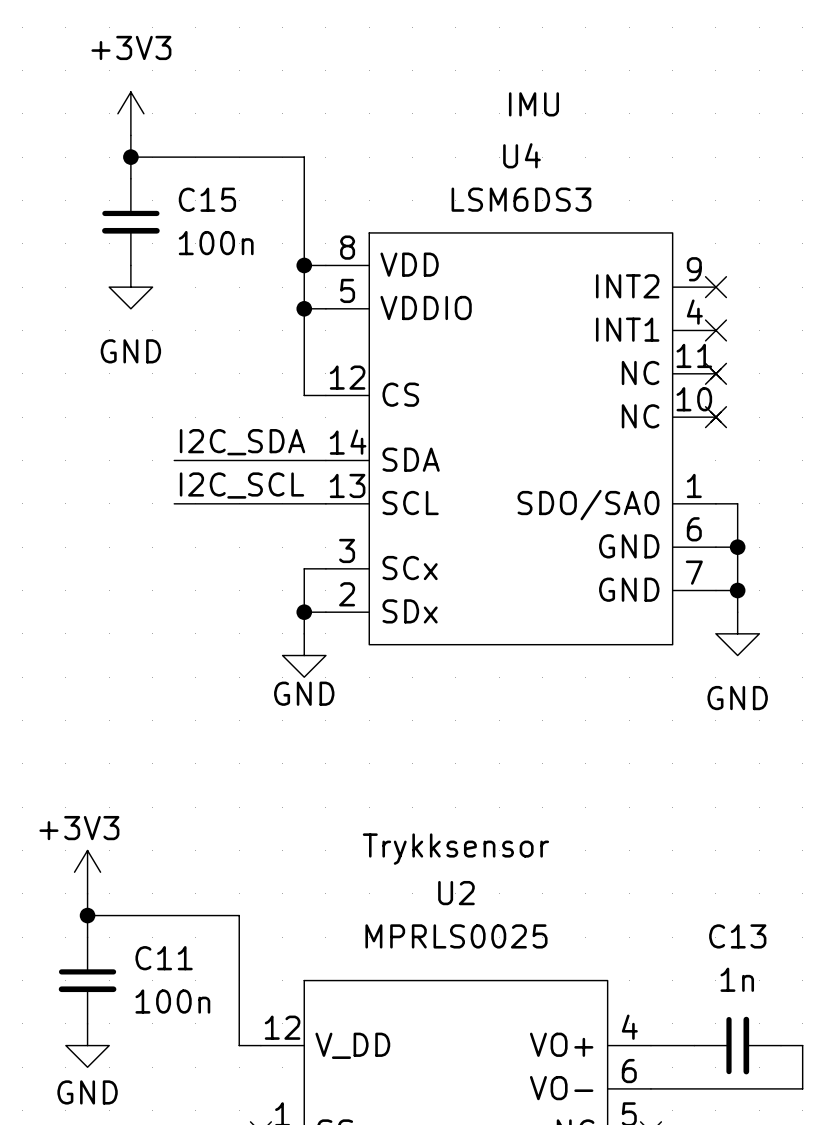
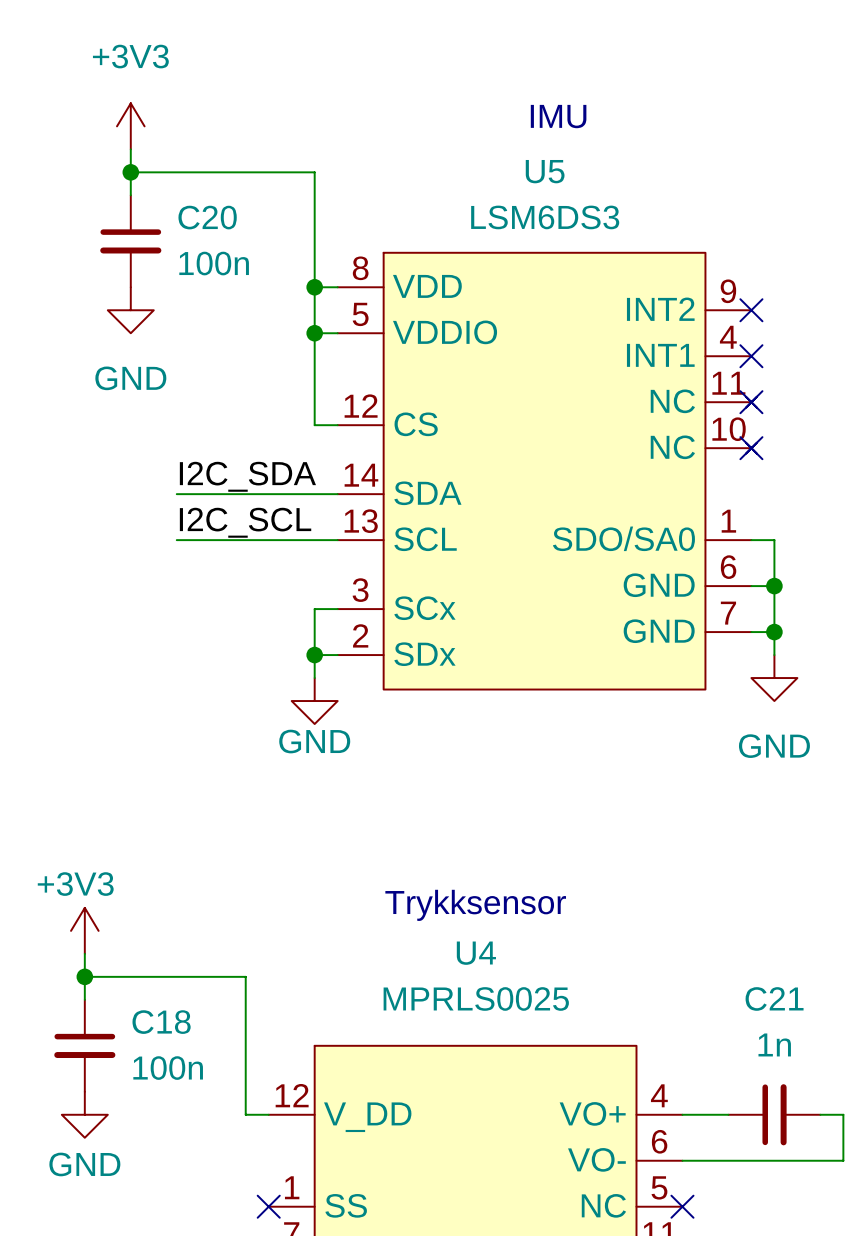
U4 name: U4 (521, 155) -> U5 (545, 171)
C15 name: C15 (207, 199) -> C20 (207, 217)
U2 name: U2 (456, 893) -> U4 (476, 953)
C13 name: C13 (737, 936) -> C21 (774, 998)
C11 name: C11 (164, 958) -> C18 (161, 1022)

